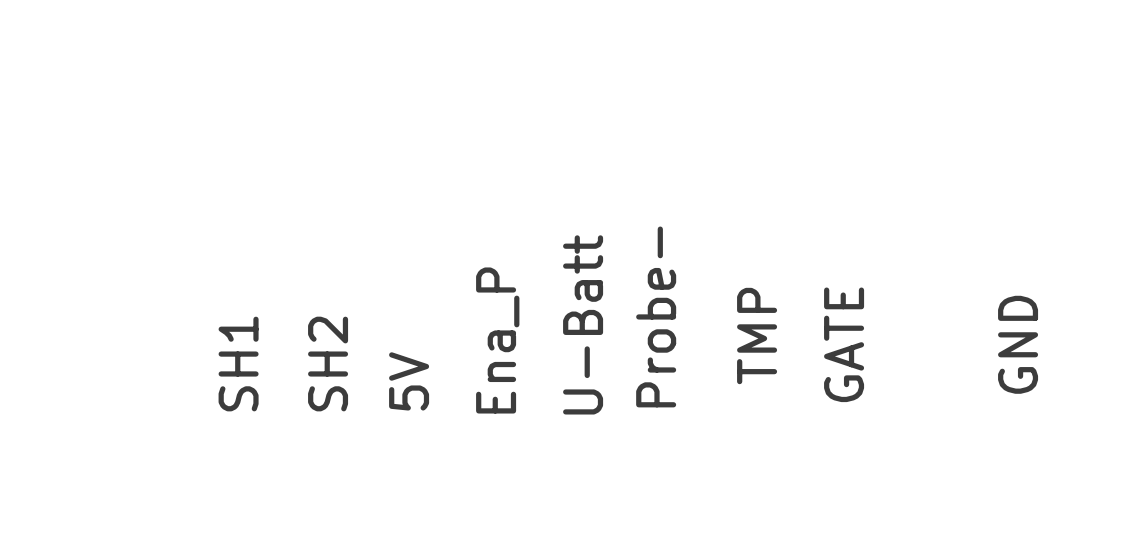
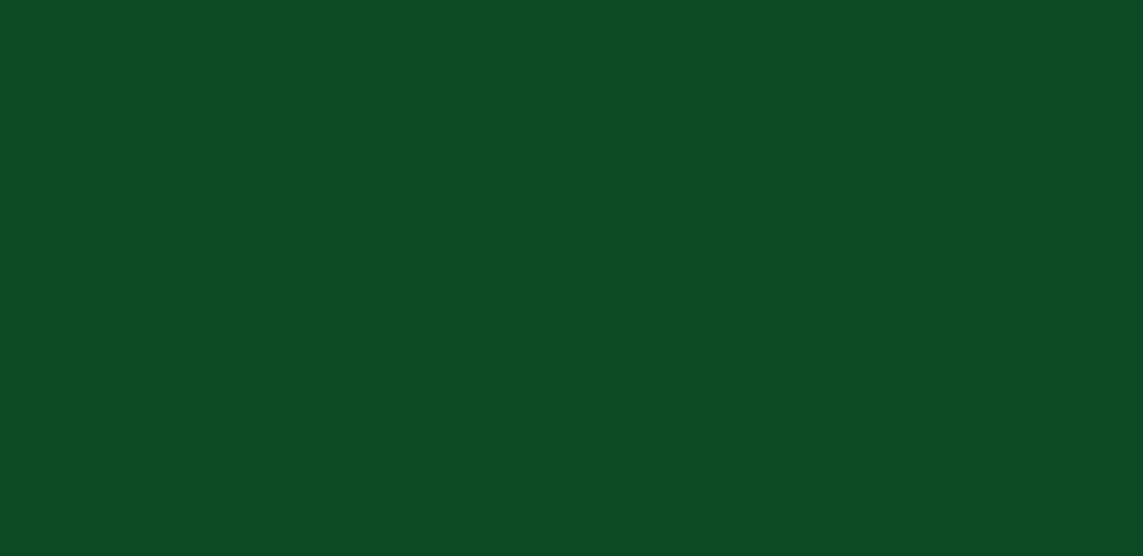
text: Probe- (656, 316) -> none
text: U-Batt (583, 324) -> none
text: TMP (757, 336) -> none
text: Ena_P (497, 340) -> none
text: GATE (844, 344) -> none
text: GND (1018, 344) -> none
text: SH1 (238, 364) -> none
text: SH2 (328, 364) -> none
text: 5V (409, 381) -> none

